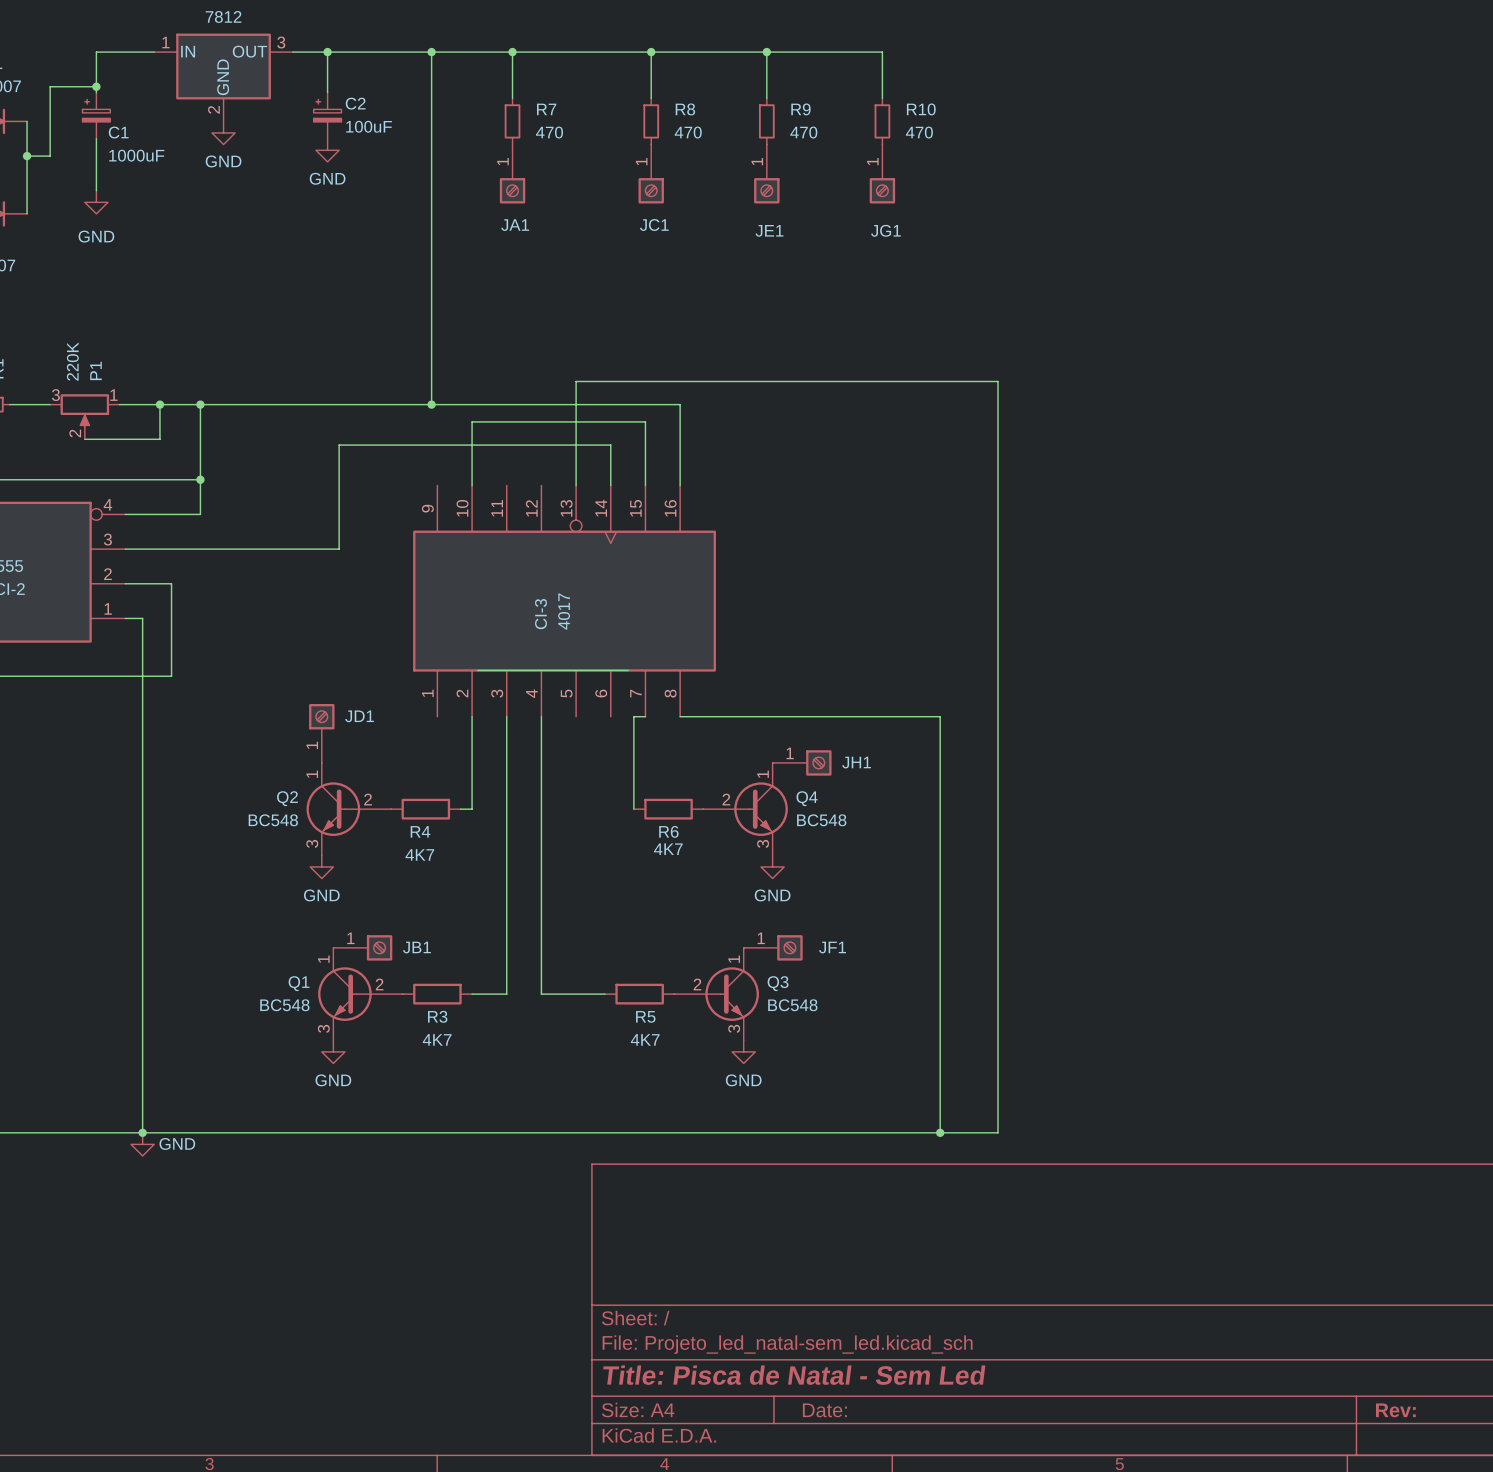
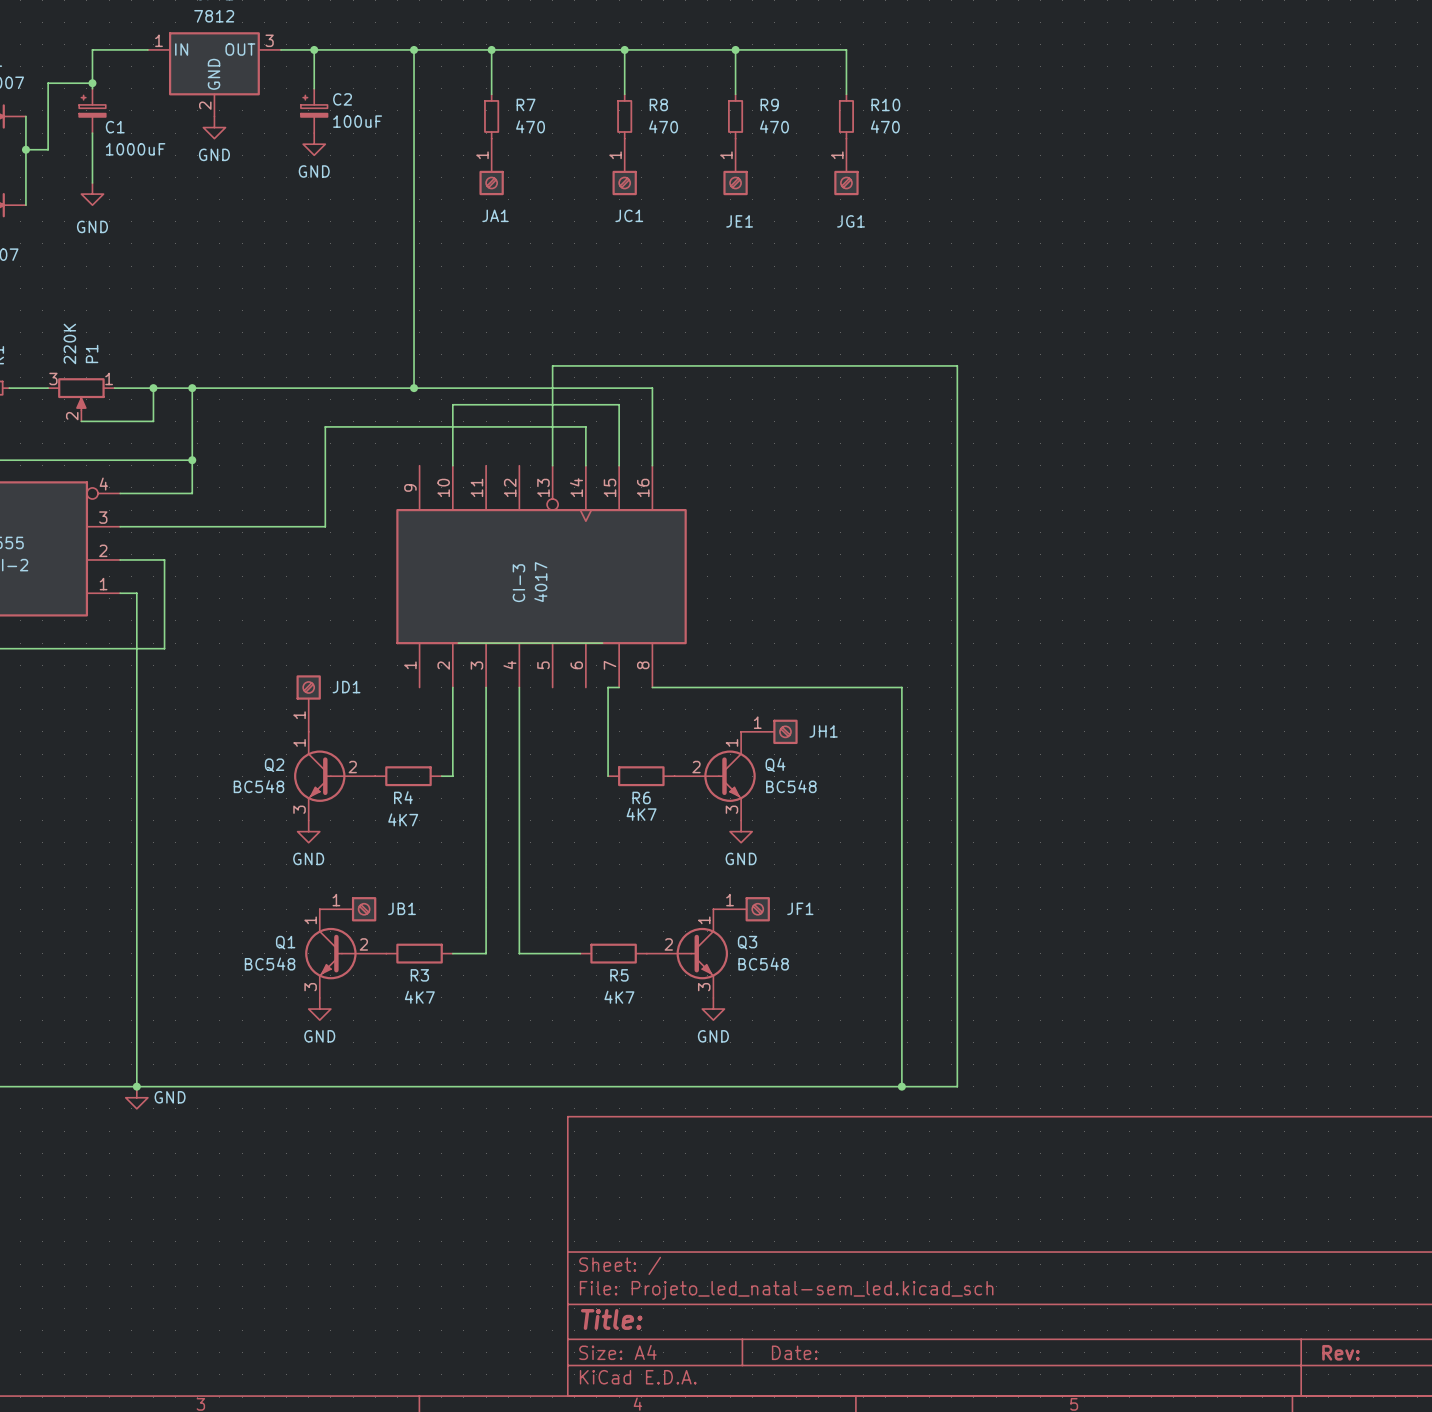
title block: Title: Pisca de Natal - Sem Led (794, 1375) -> Title: (611, 1319)

